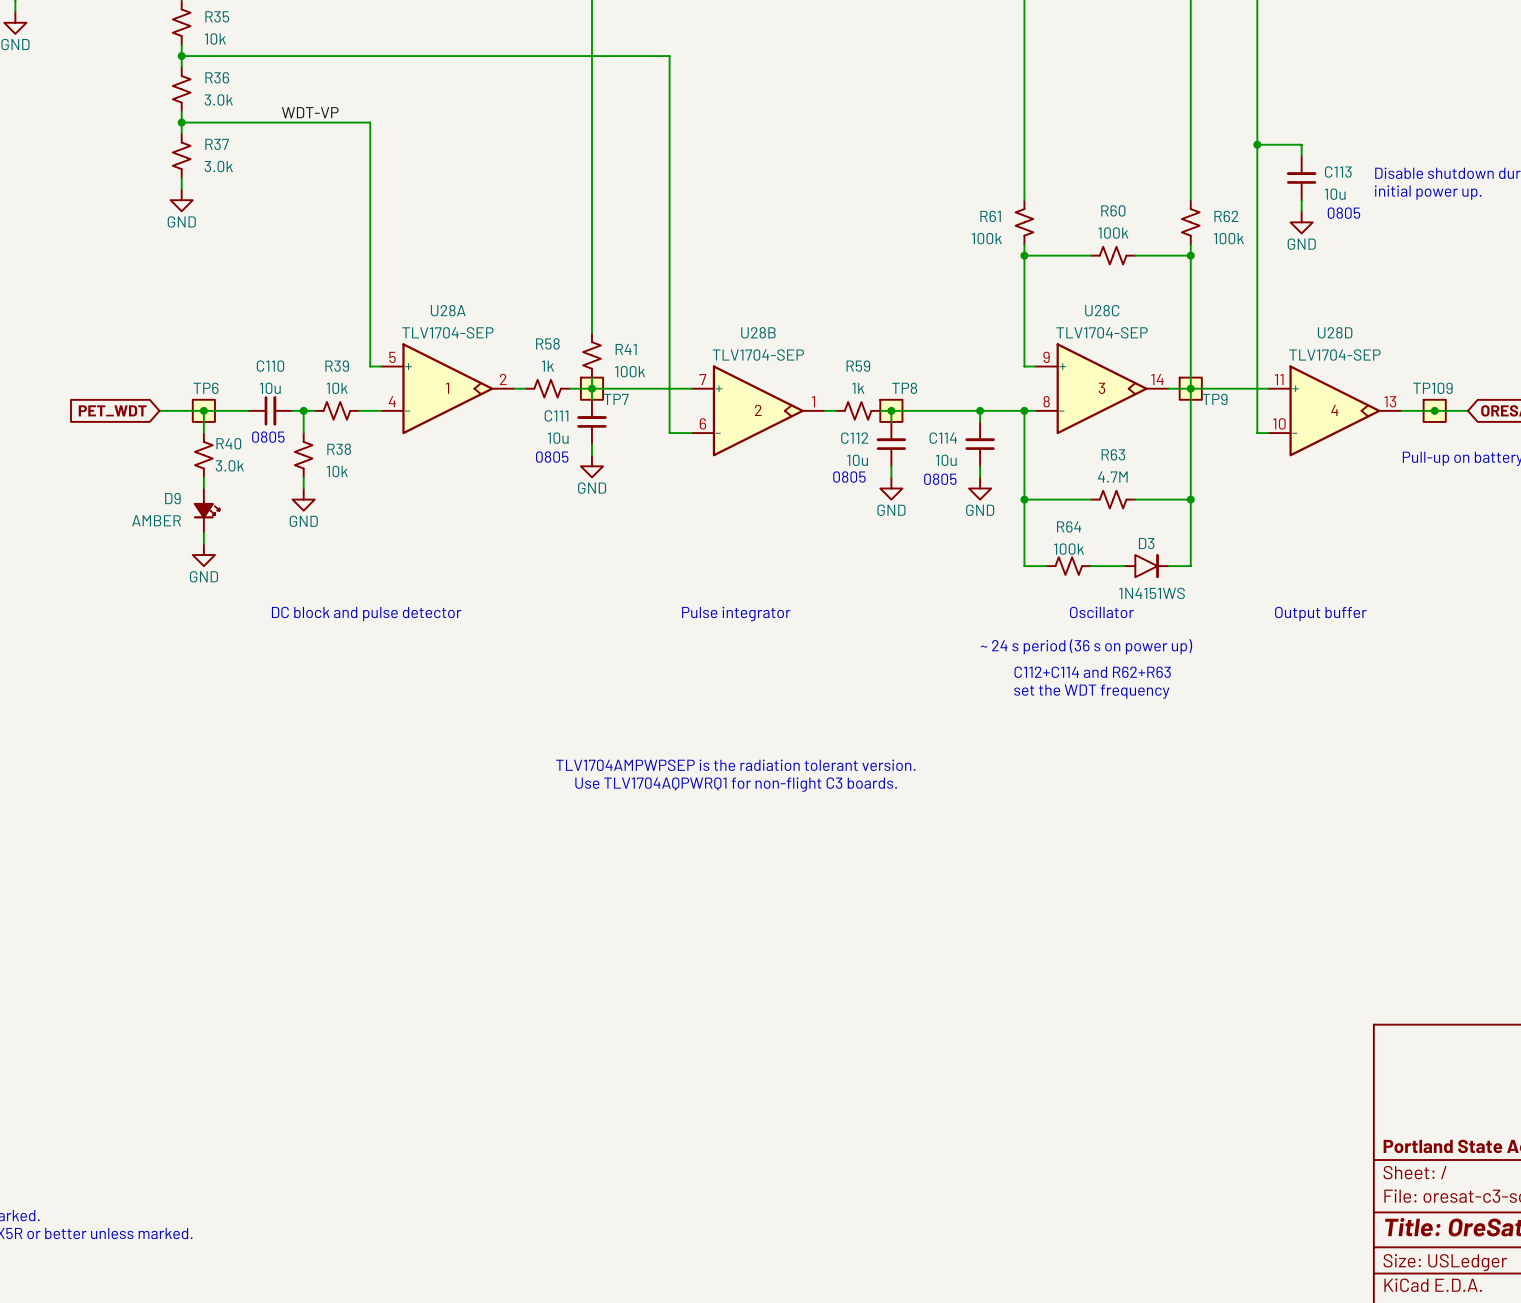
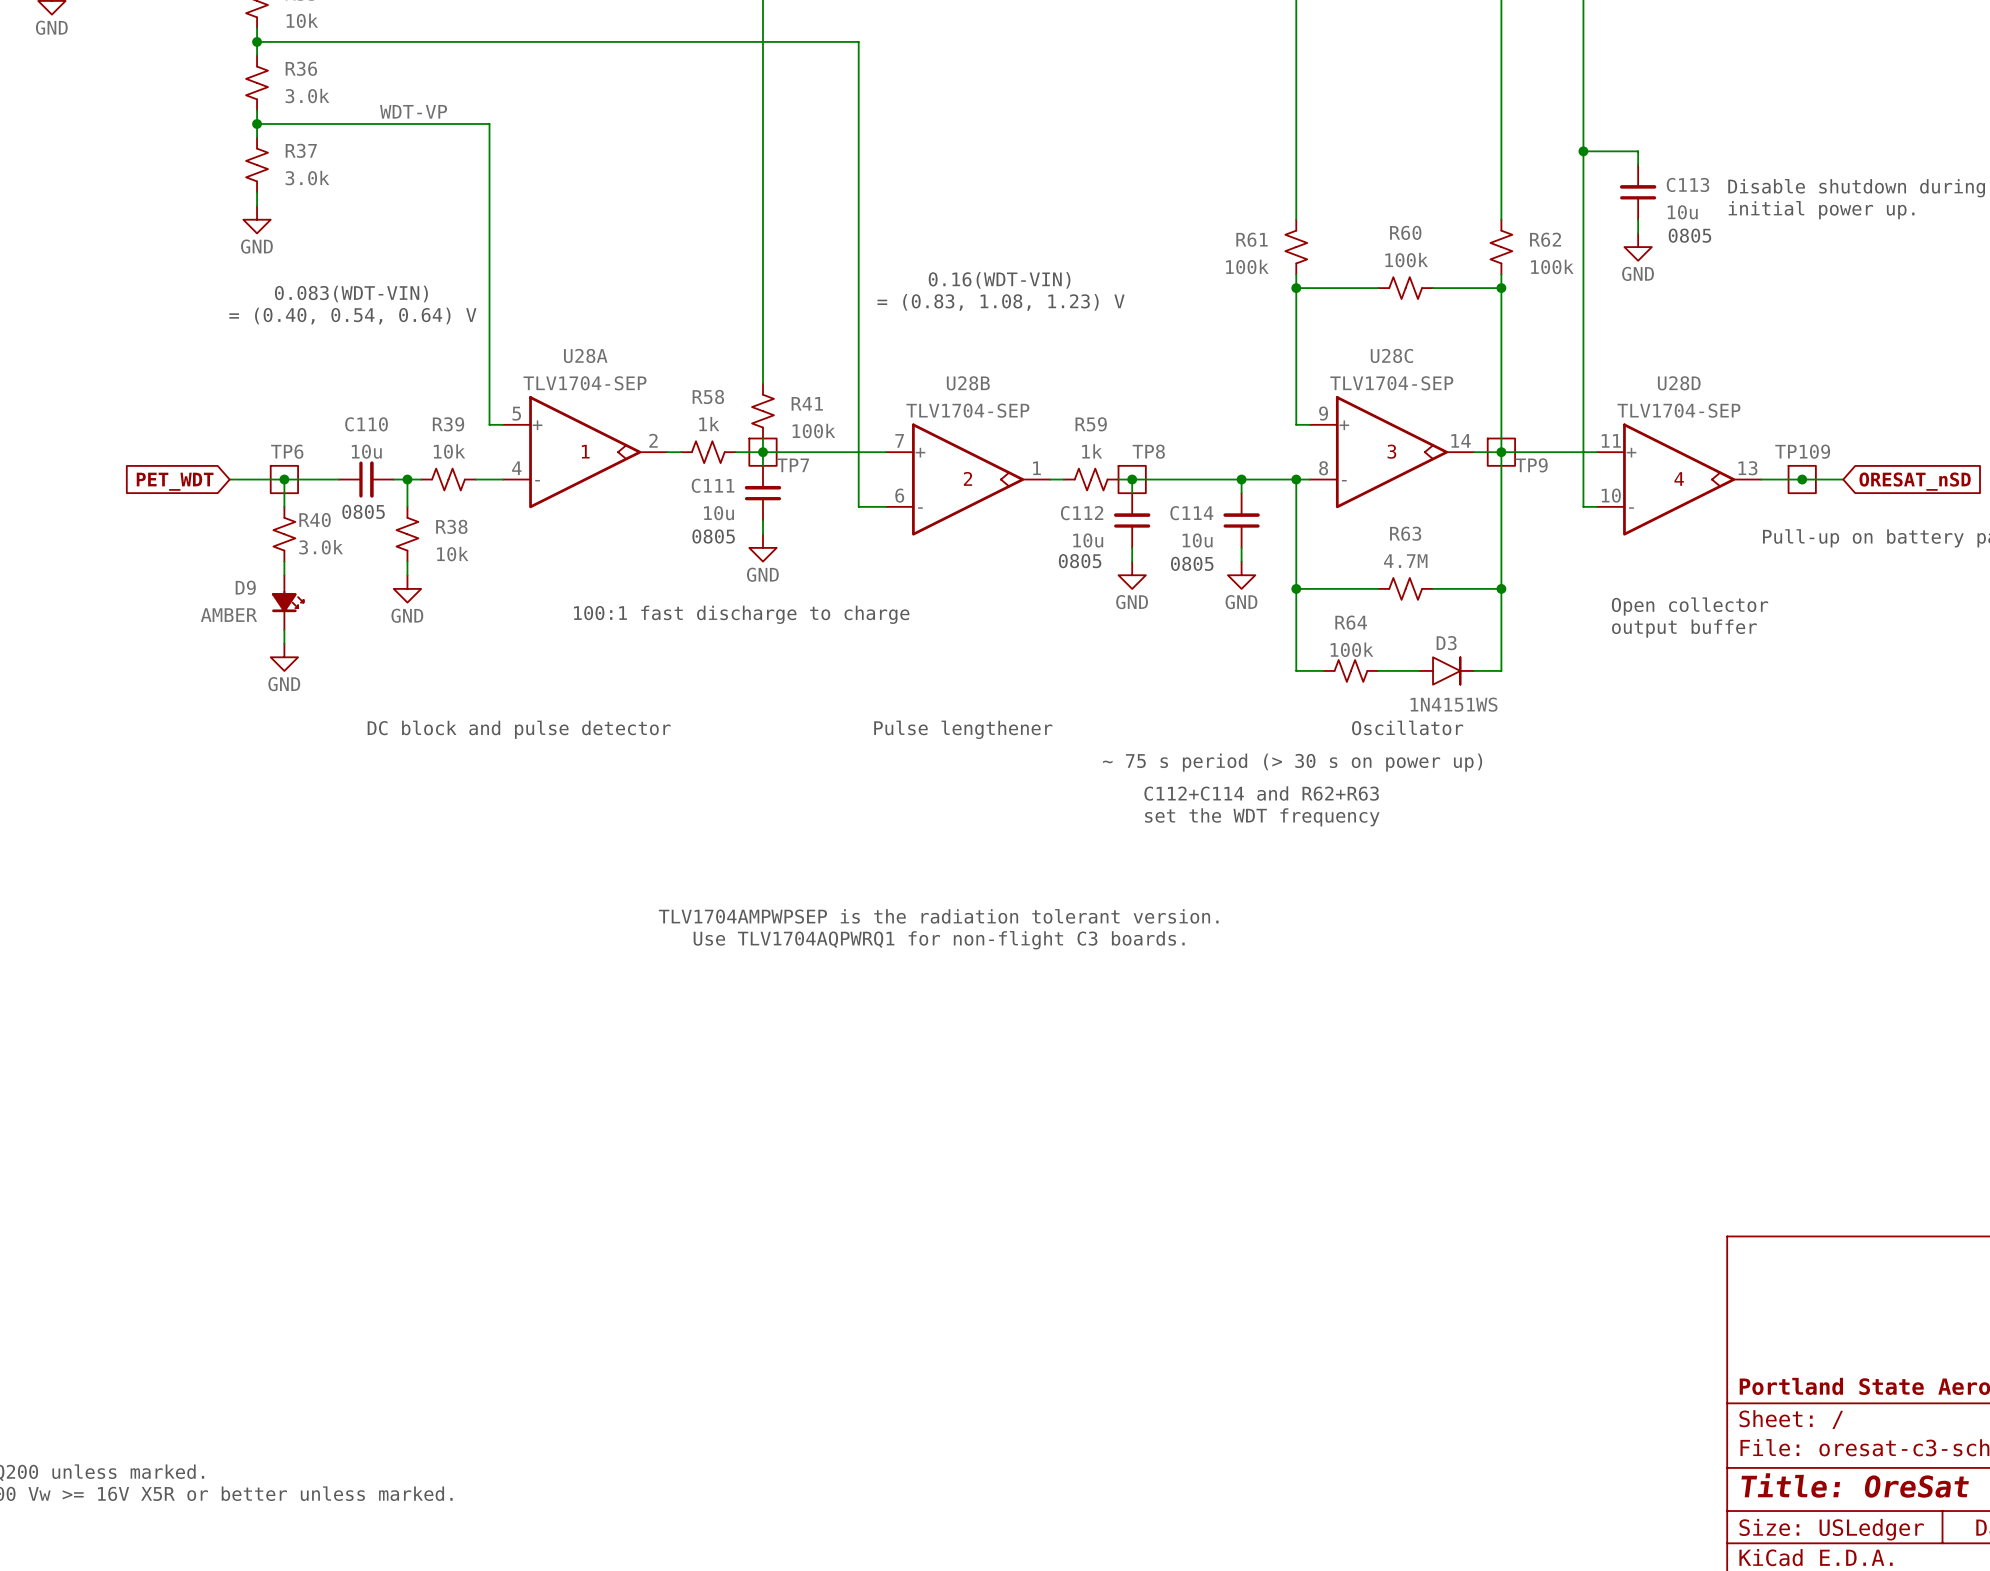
text: none -> 0.16(WDT-VIN) (999, 280)
text: none -> 0.083(WDT-VIN) (351, 293)
text: none -> = (0.83, 1.08, 1.23) V (1001, 302)
text: none -> = (0.40, 0.54, 0.64) V (352, 316)
text: none -> Open collector (1690, 606)
text: none -> 100:1 fast discharge to charge (741, 614)
text: none -> output buffer (1684, 628)
text: Pulse integrator (736, 613) -> Pulse lengthener (963, 729)
text: Output buffer (1320, 613) -> none
text: ~ 24 s period (36 s on power up) (1086, 646) -> ~ 75 s period (> 30 s on power up) (1292, 762)
text position: C112+C114 and R62+R63 (1092, 672) -> C112+C114 and R62+R63 (1261, 793)
text position: set the WDT frequency (1091, 691) -> set the WDT frequency (1262, 817)

